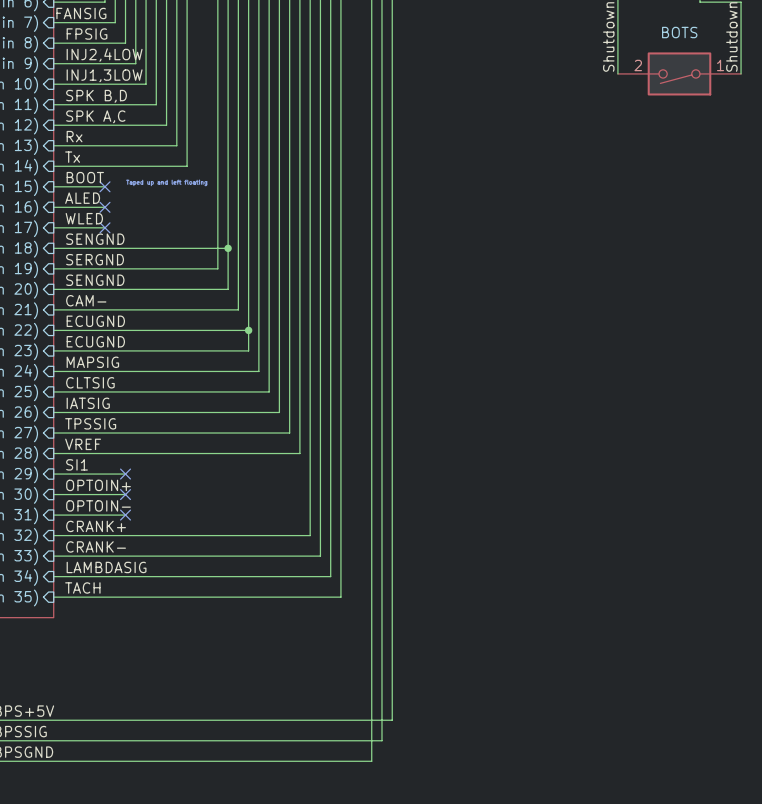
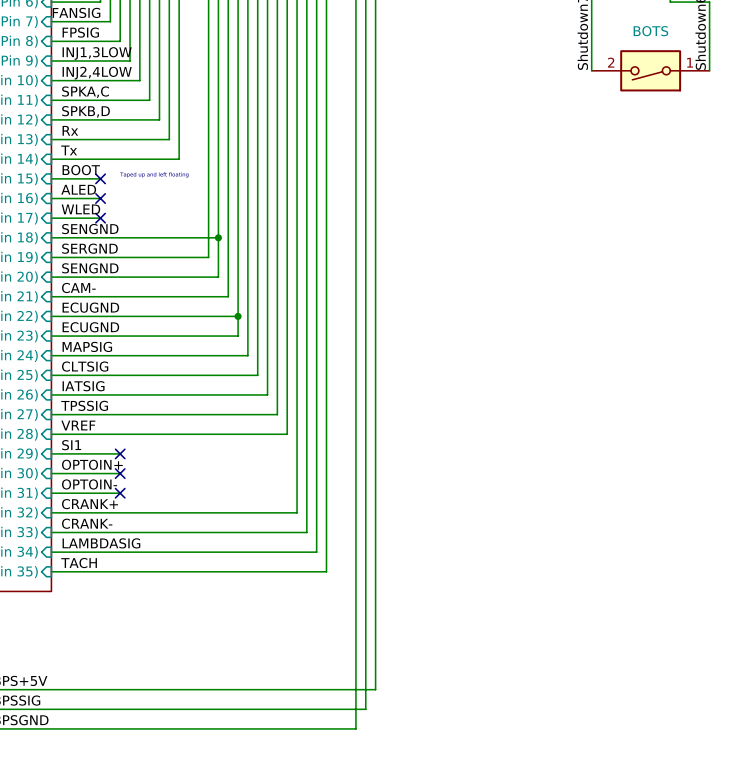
label: INJ2,4LOW (104, 55) -> INJ1,3LOW (97, 53)
label: INJ1,3LOW (104, 75) -> INJ2,4LOW (97, 73)
label: SPK B,D (96, 96) -> SPKA,C (85, 92)
label: SPK A,C (95, 116) -> SPKB,D (86, 111)

